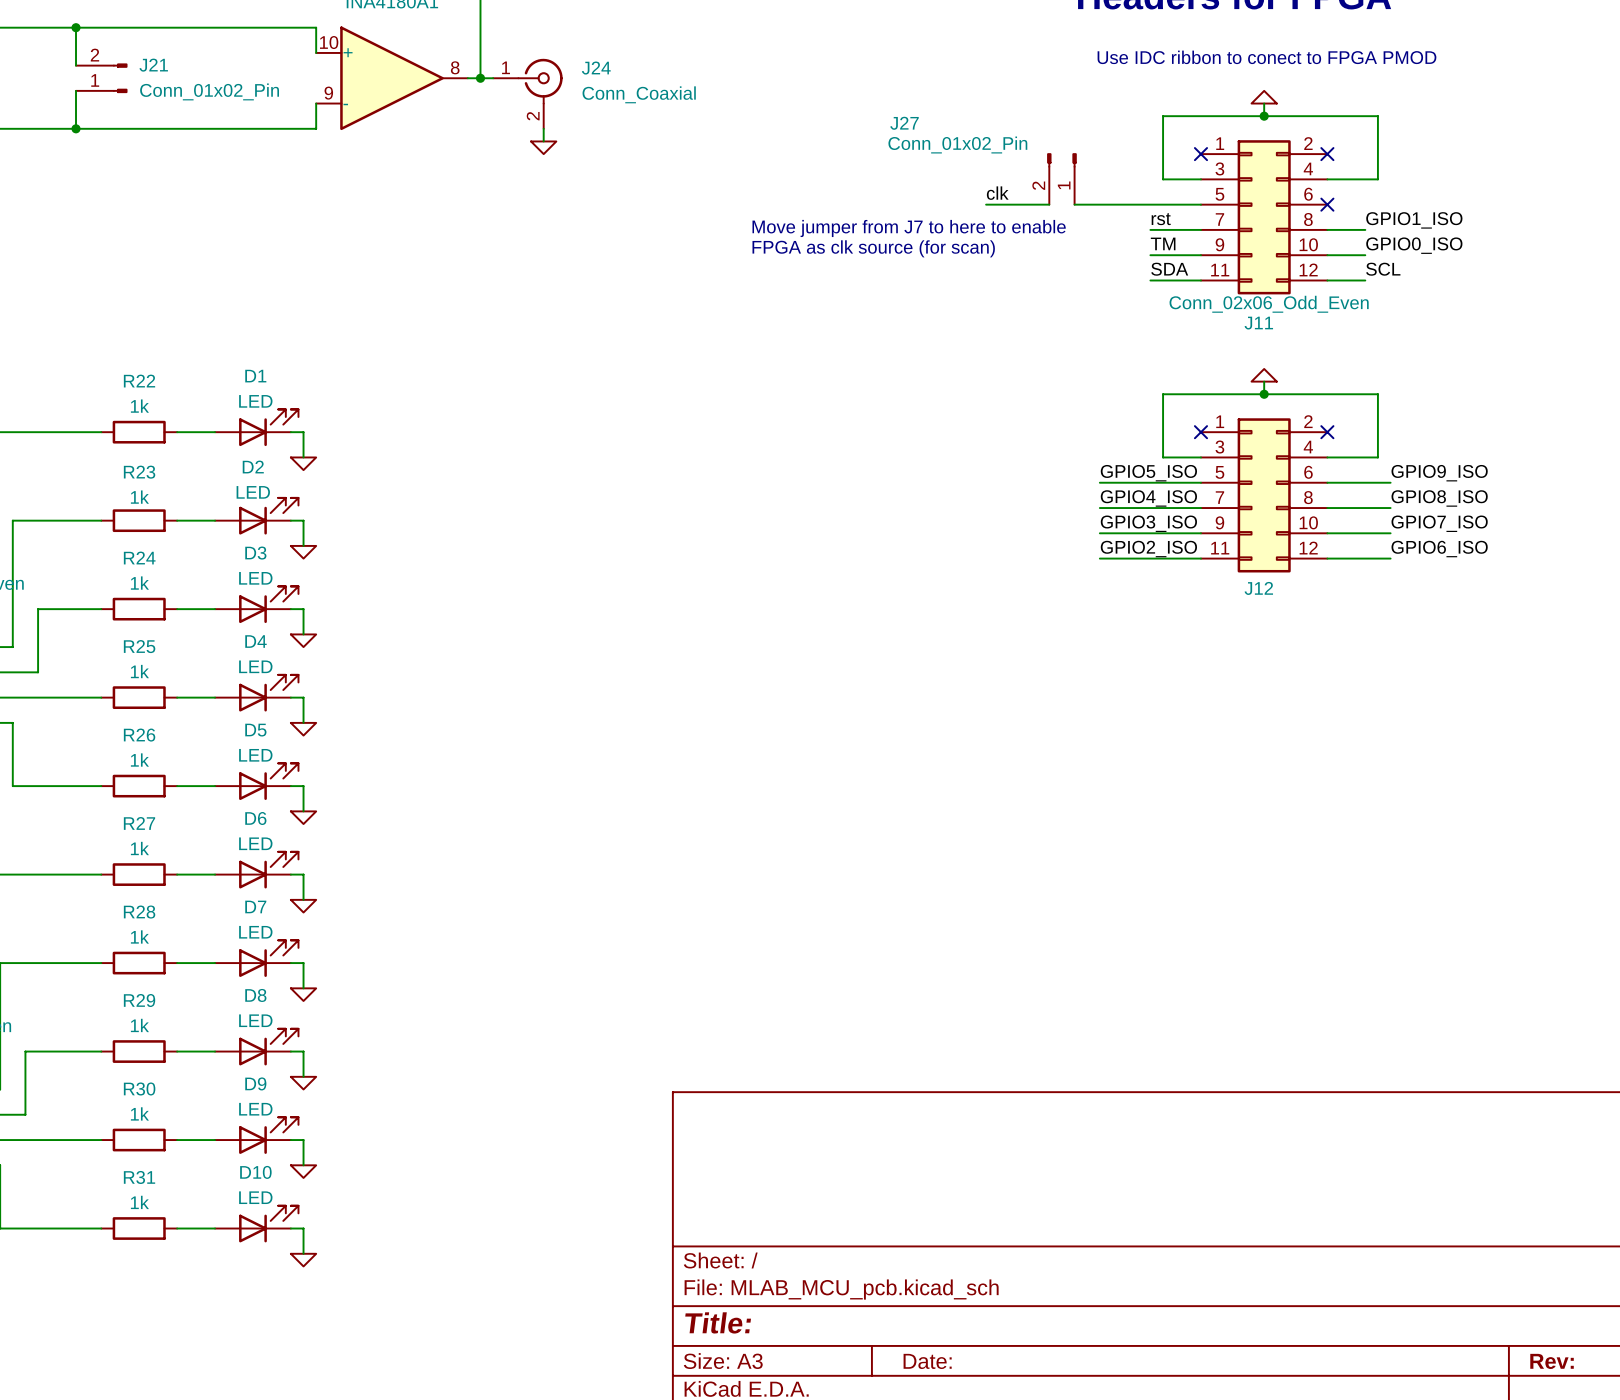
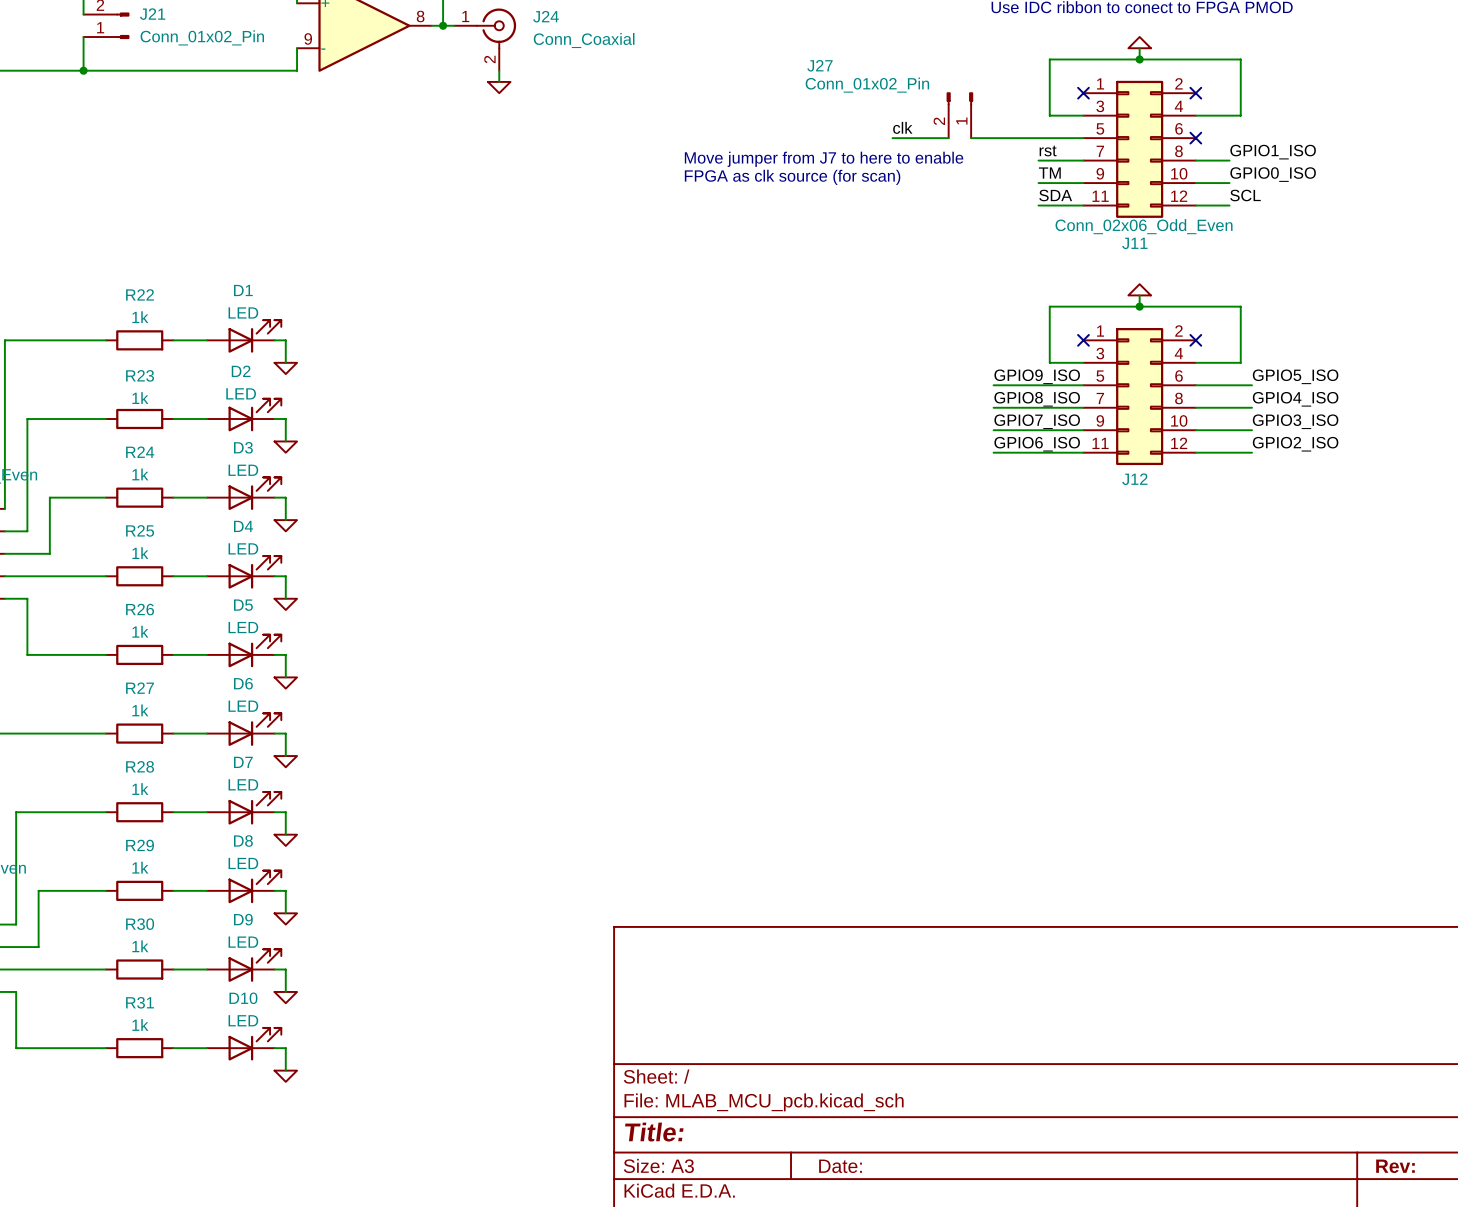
label: GPIO5_ISO (1148, 473) -> GPIO9_ISO (1037, 376)
label: GPIO9_ISO (1439, 473) -> GPIO5_ISO (1295, 376)
label: GPIO4_ISO (1148, 498) -> GPIO8_ISO (1037, 399)
label: GPIO8_ISO (1439, 498) -> GPIO4_ISO (1295, 399)
label: GPIO3_ISO (1148, 523) -> GPIO7_ISO (1037, 421)
label: GPIO7_ISO (1439, 523) -> GPIO3_ISO (1295, 421)
label: GPIO2_ISO (1148, 549) -> GPIO6_ISO (1037, 444)
label: GPIO6_ISO (1439, 549) -> GPIO2_ISO (1295, 444)

